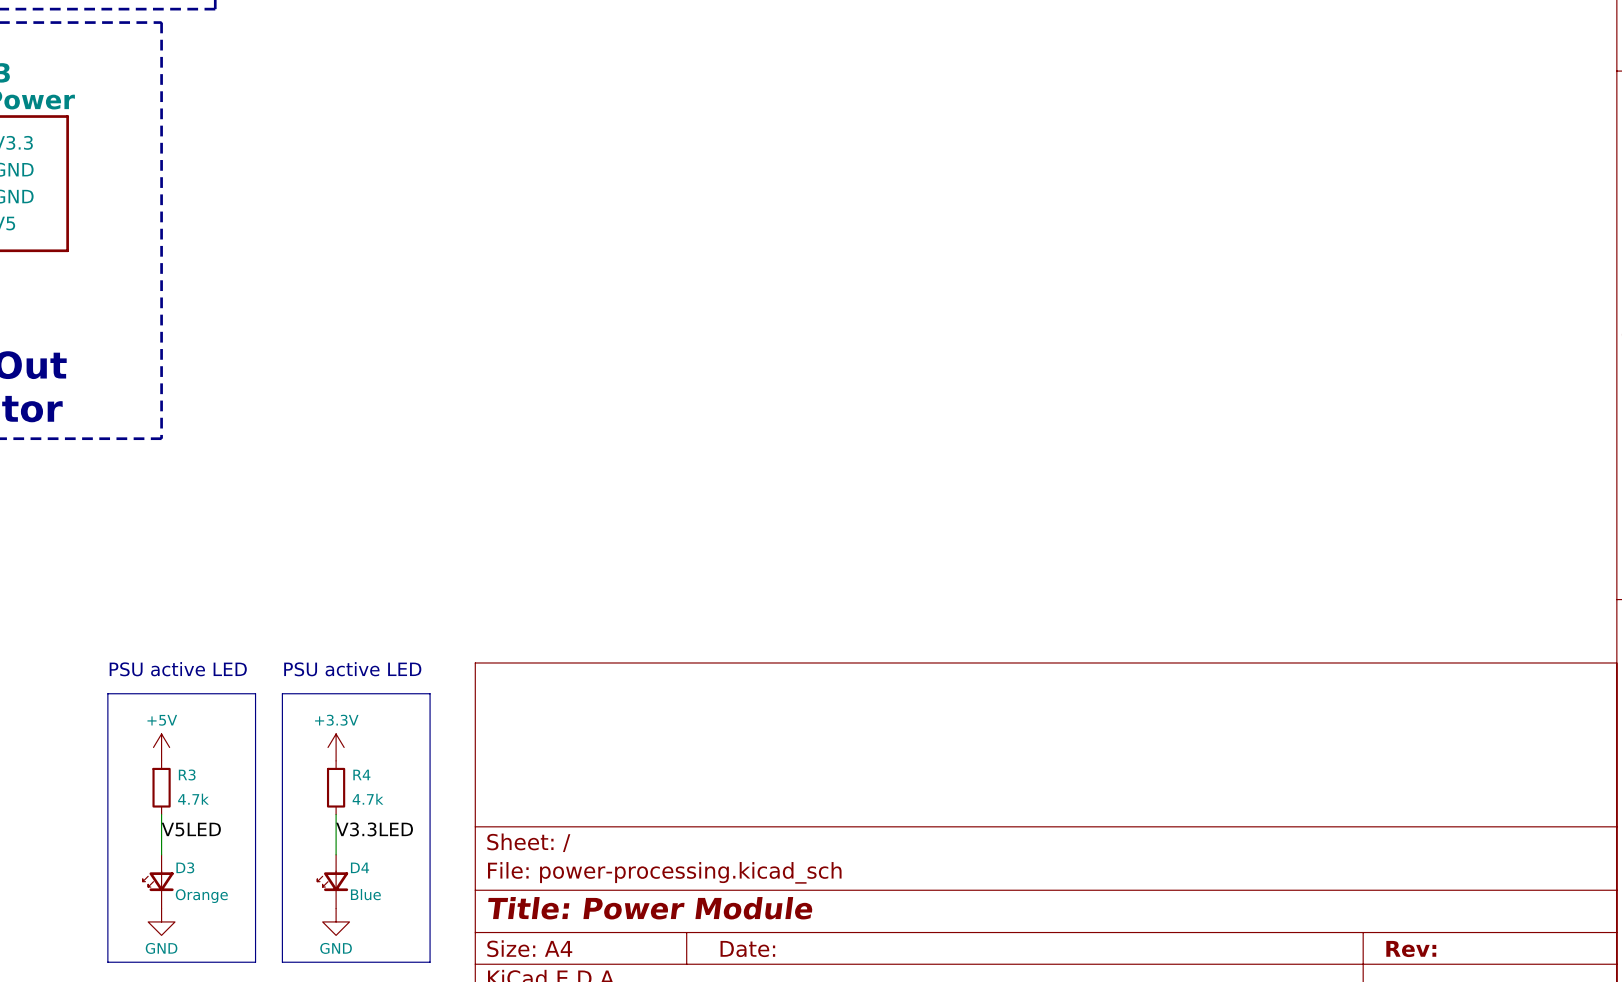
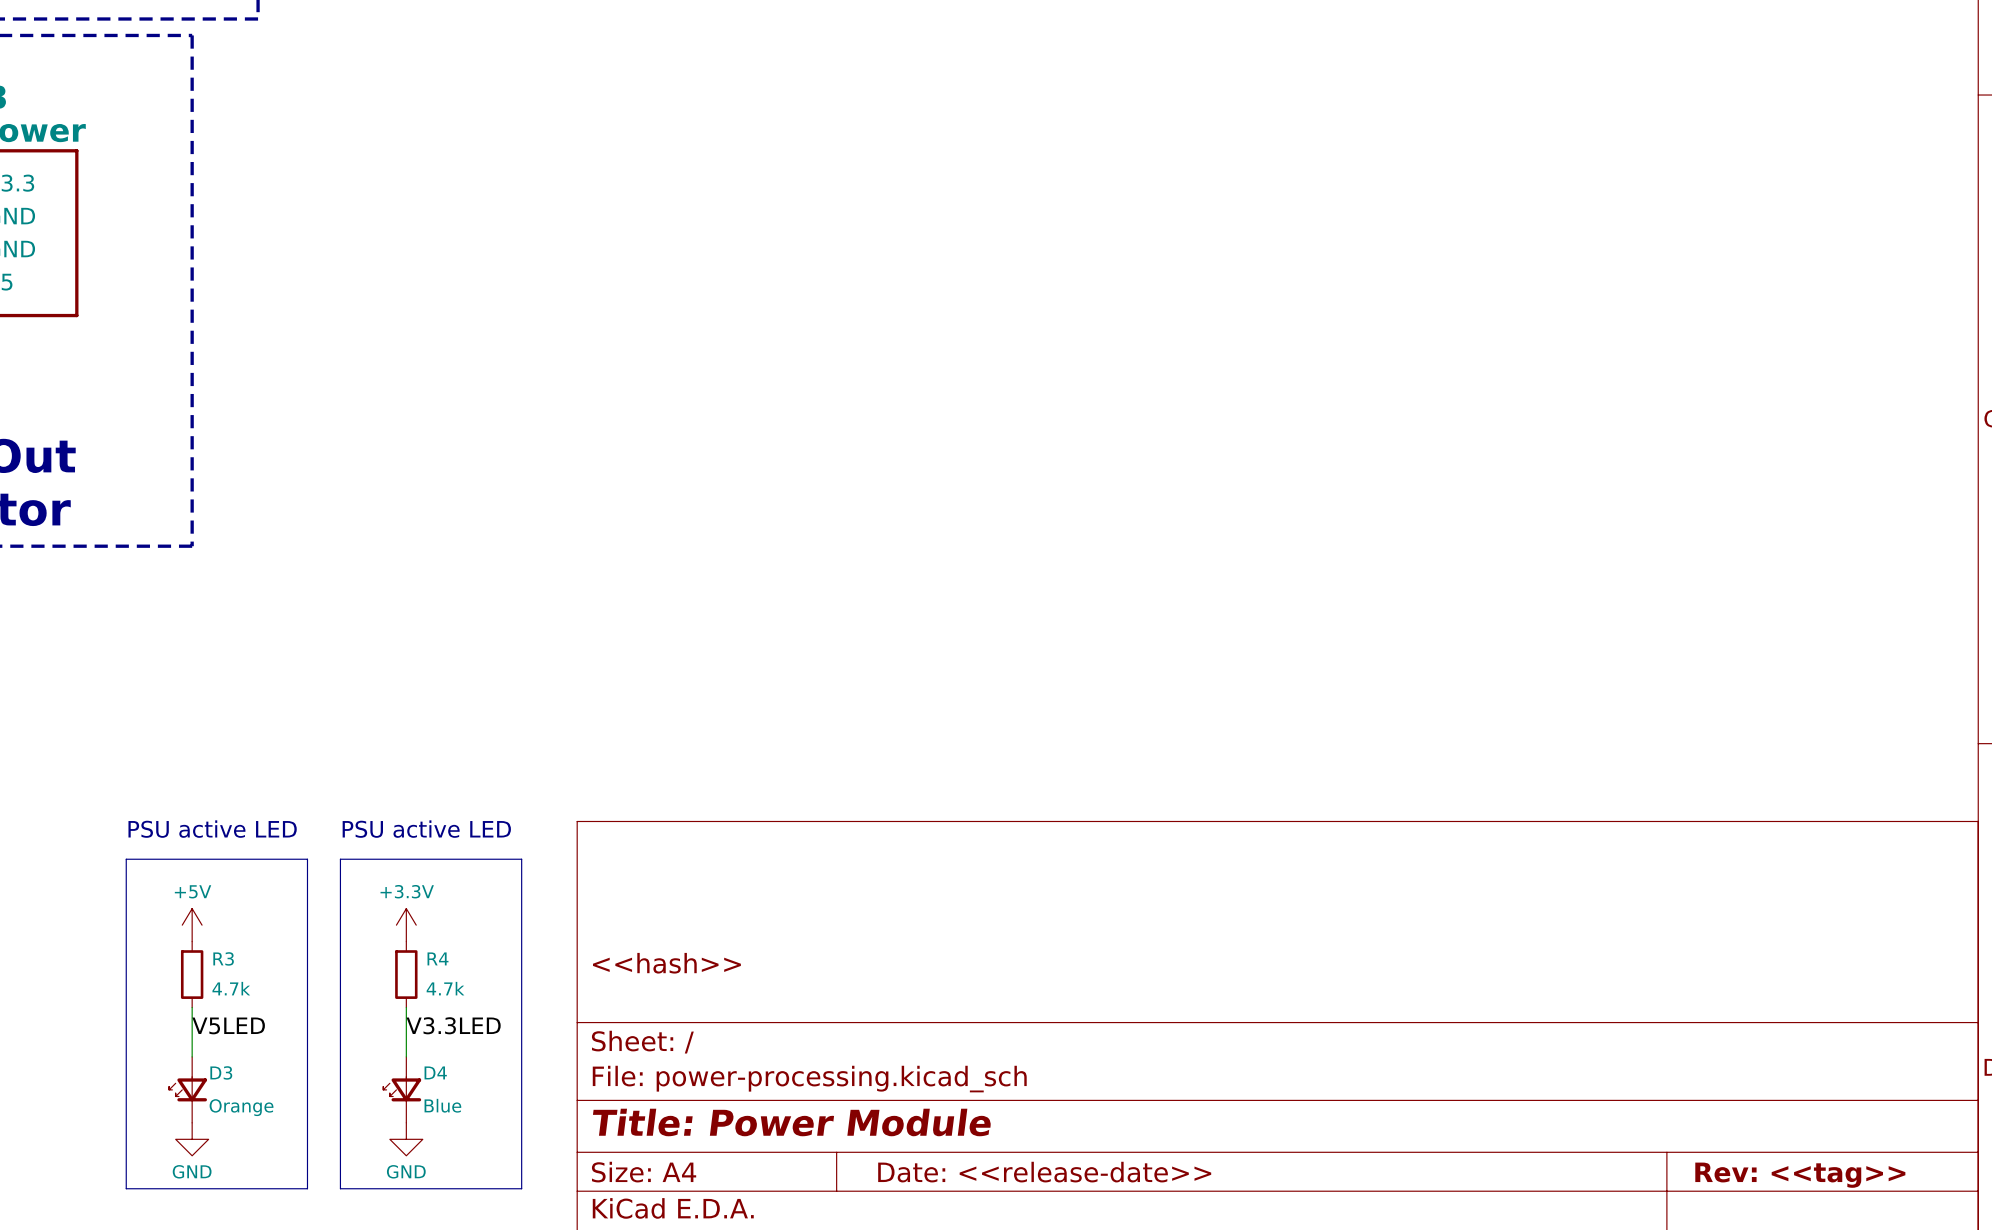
title block: none -> <<hash>> (666, 963)
title block: Date: (747, 949) -> Date: <<release-date>> (1044, 1172)
title block: Rev: (1411, 949) -> Rev: <<tag>> (1800, 1175)

